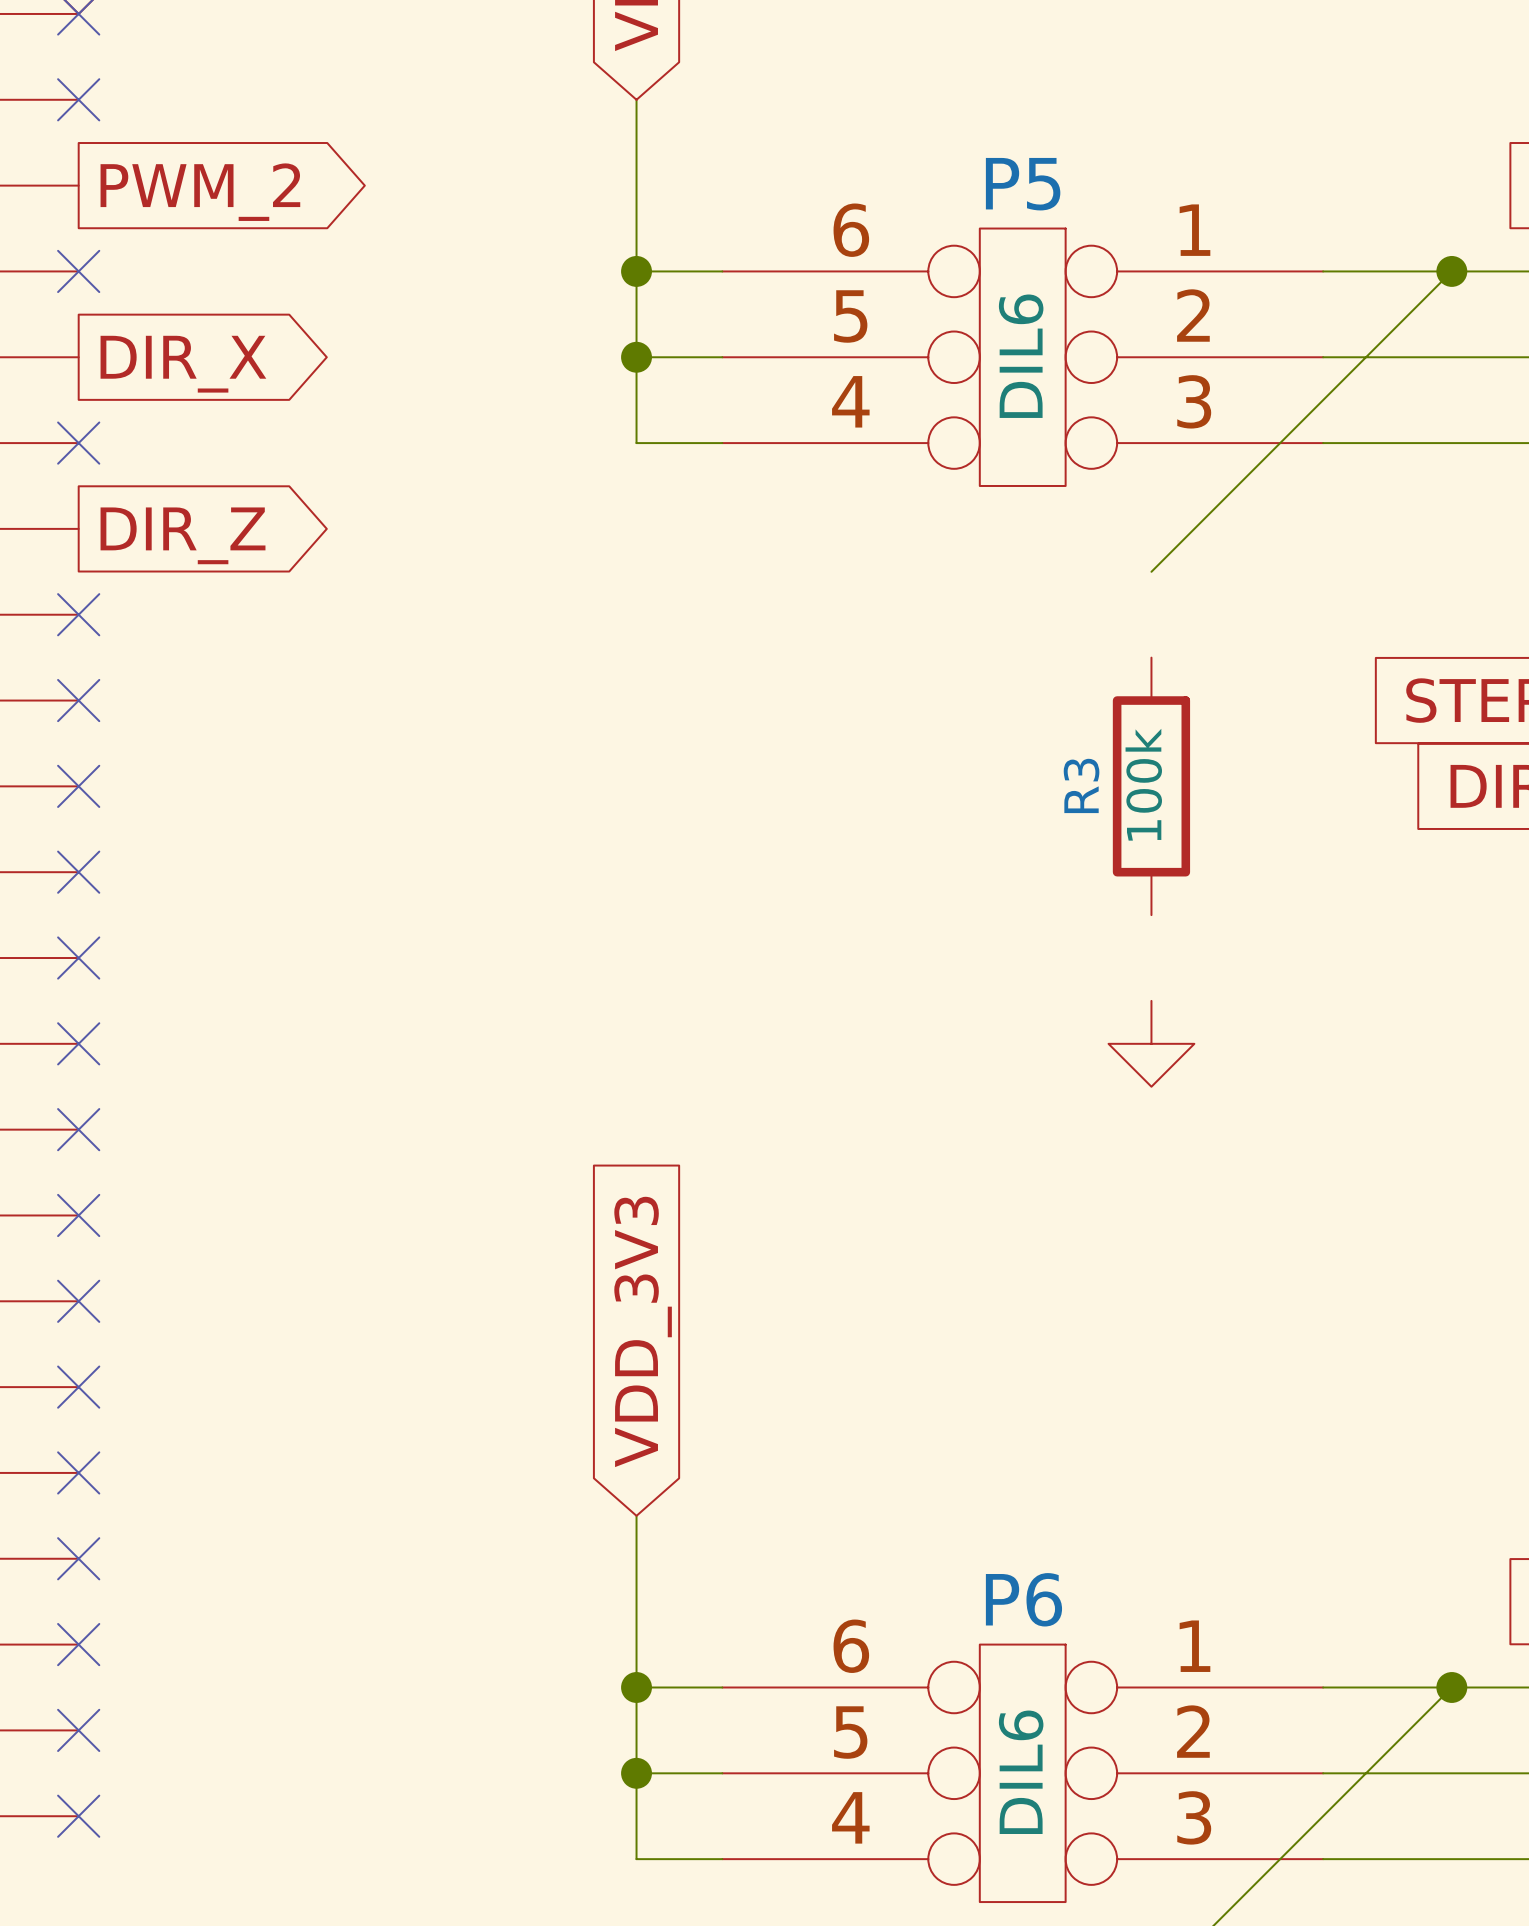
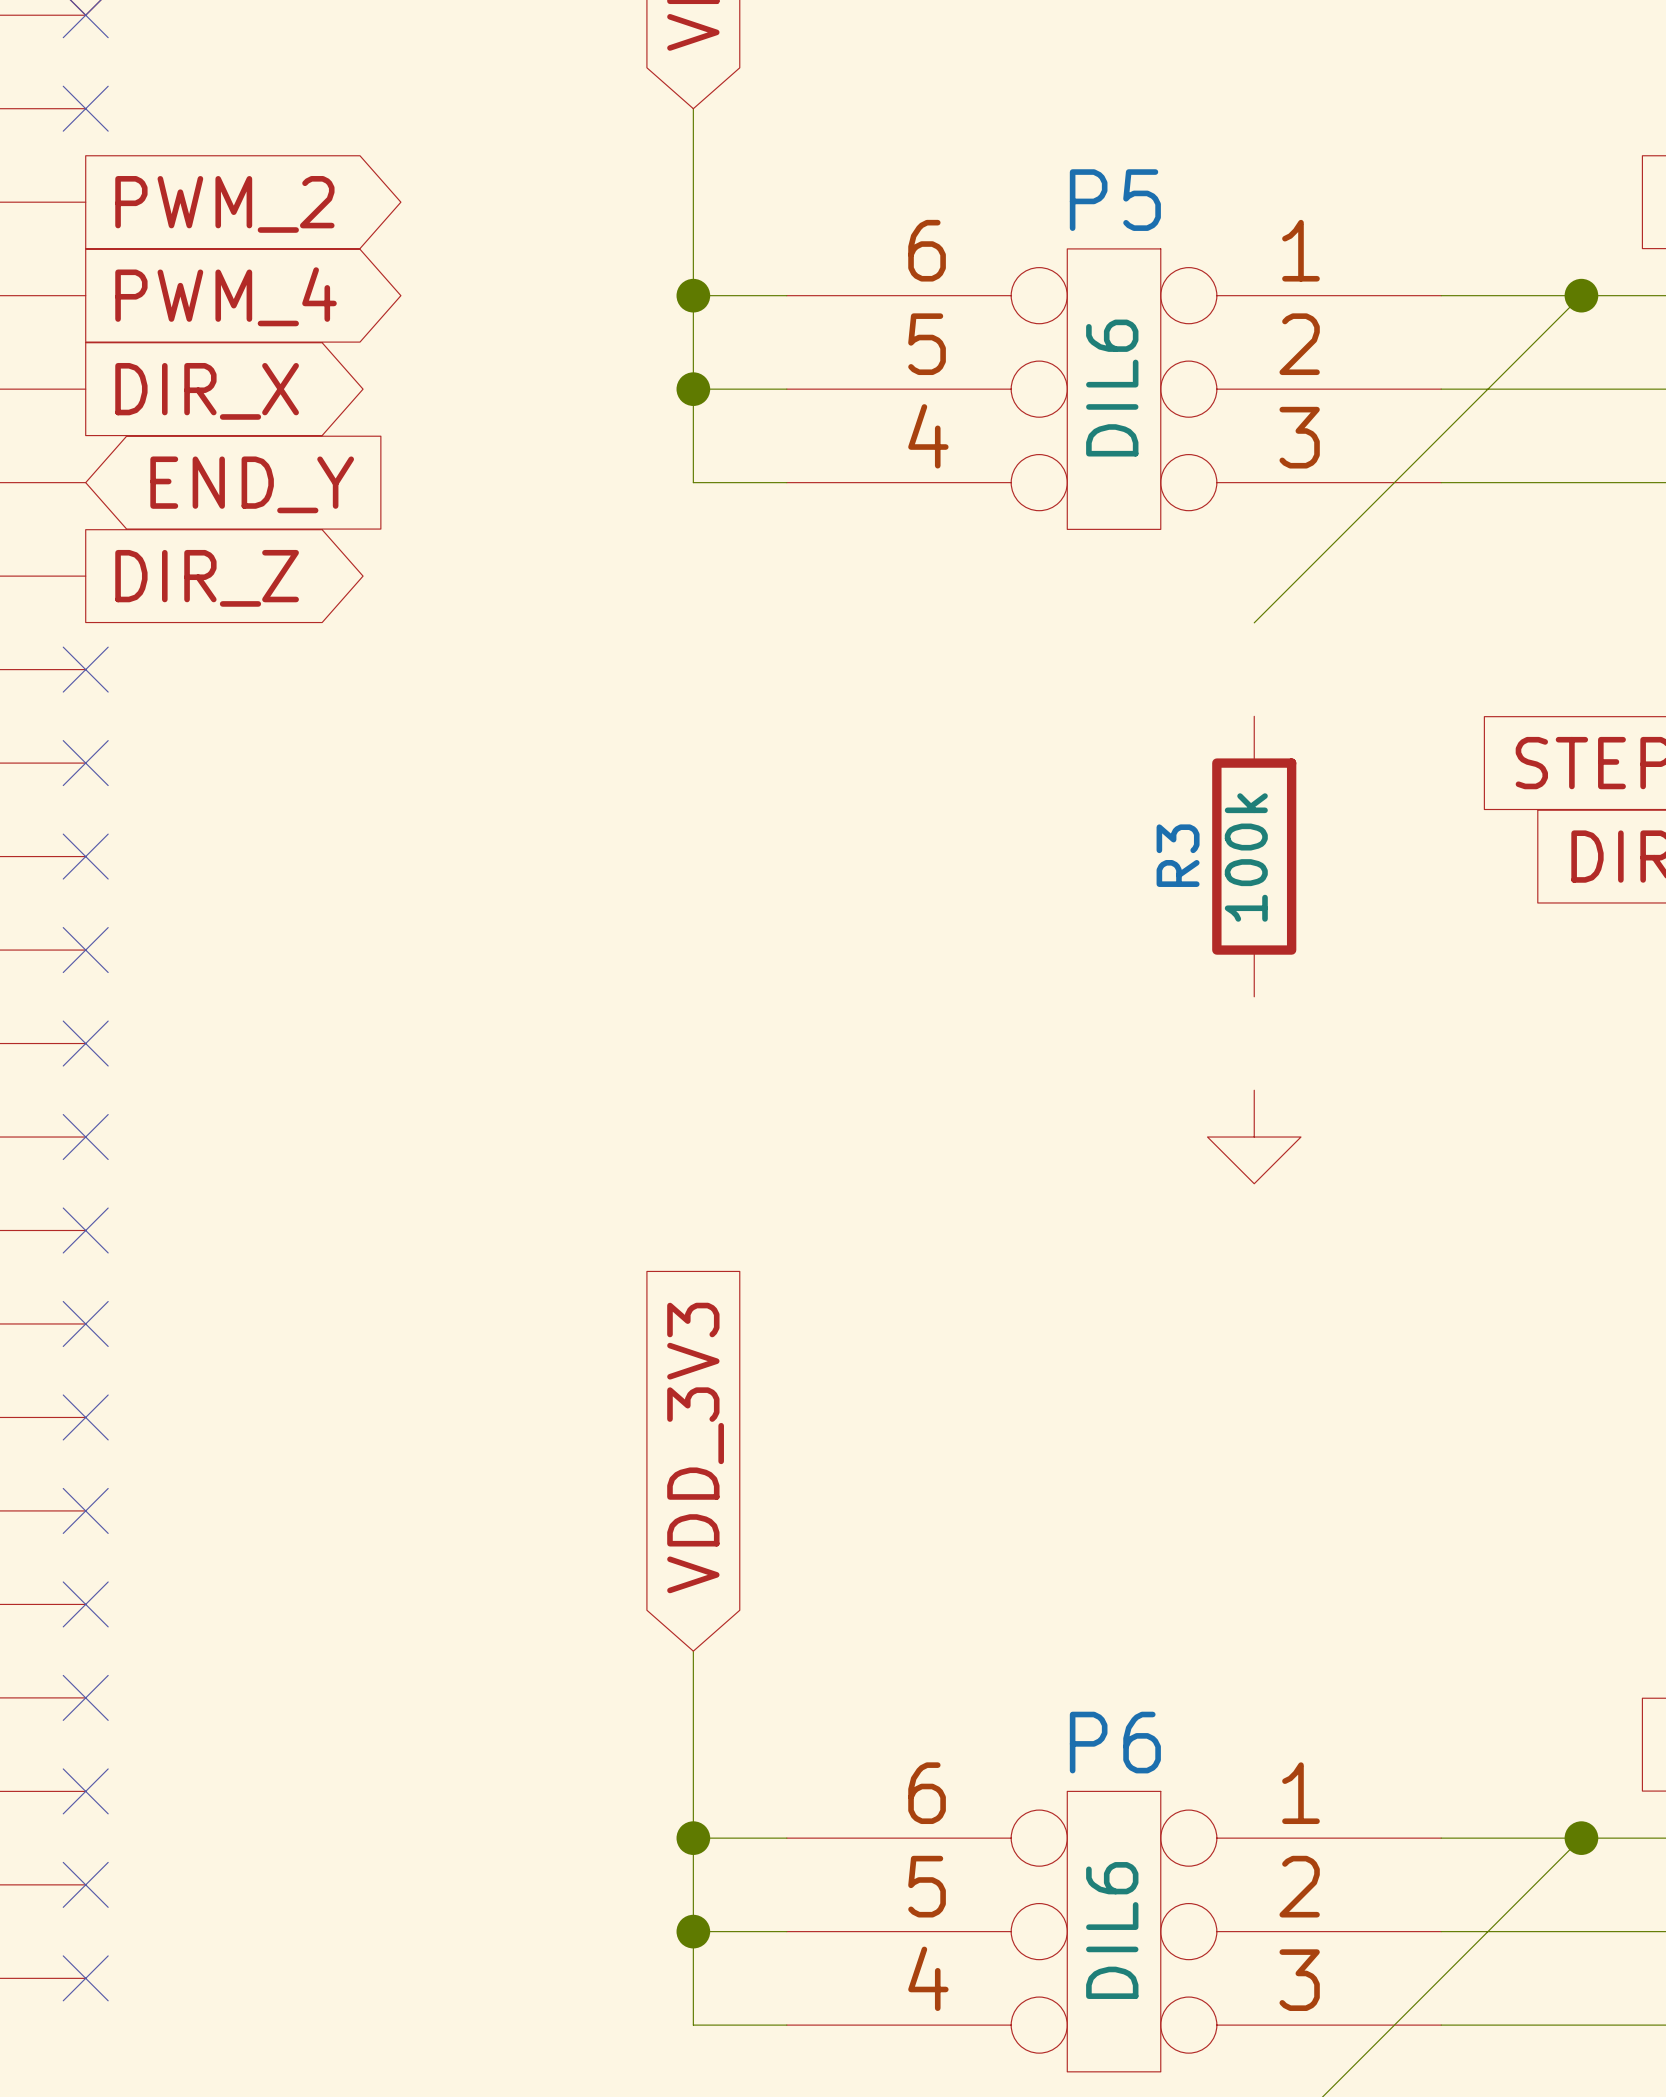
no-connect mark: (78, 271) -> none
global label: none -> PWM_4 (226, 296)
no-connect mark: (78, 443) -> none
global label: none -> END_Y (252, 484)

